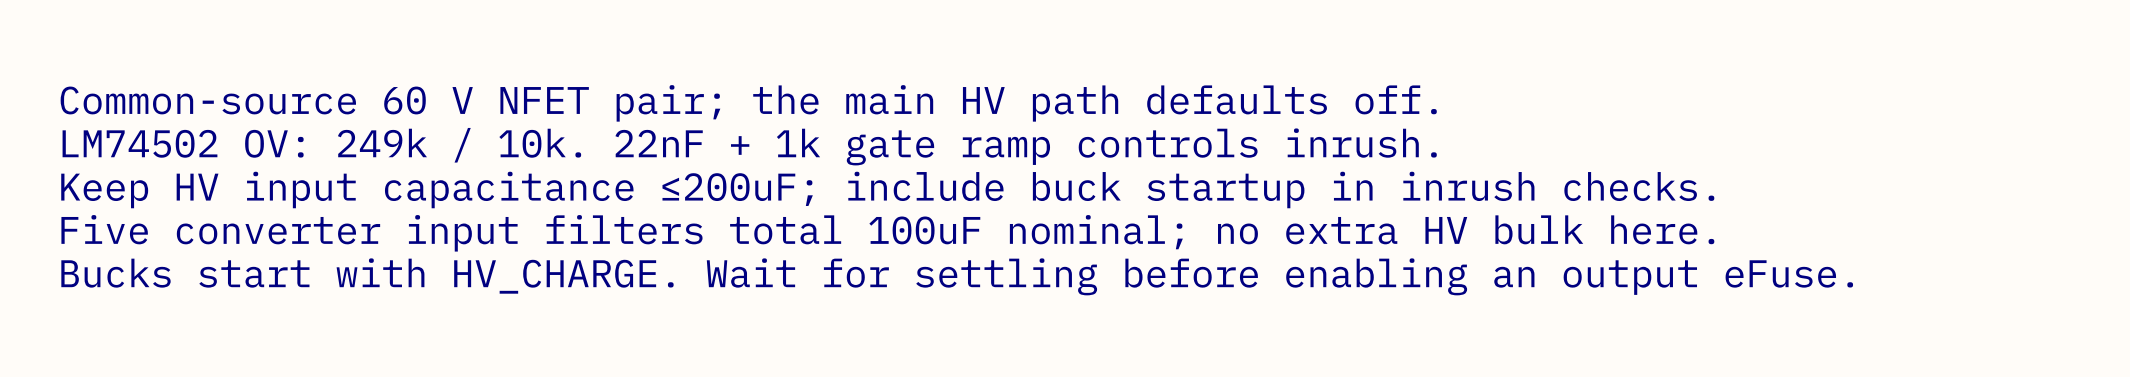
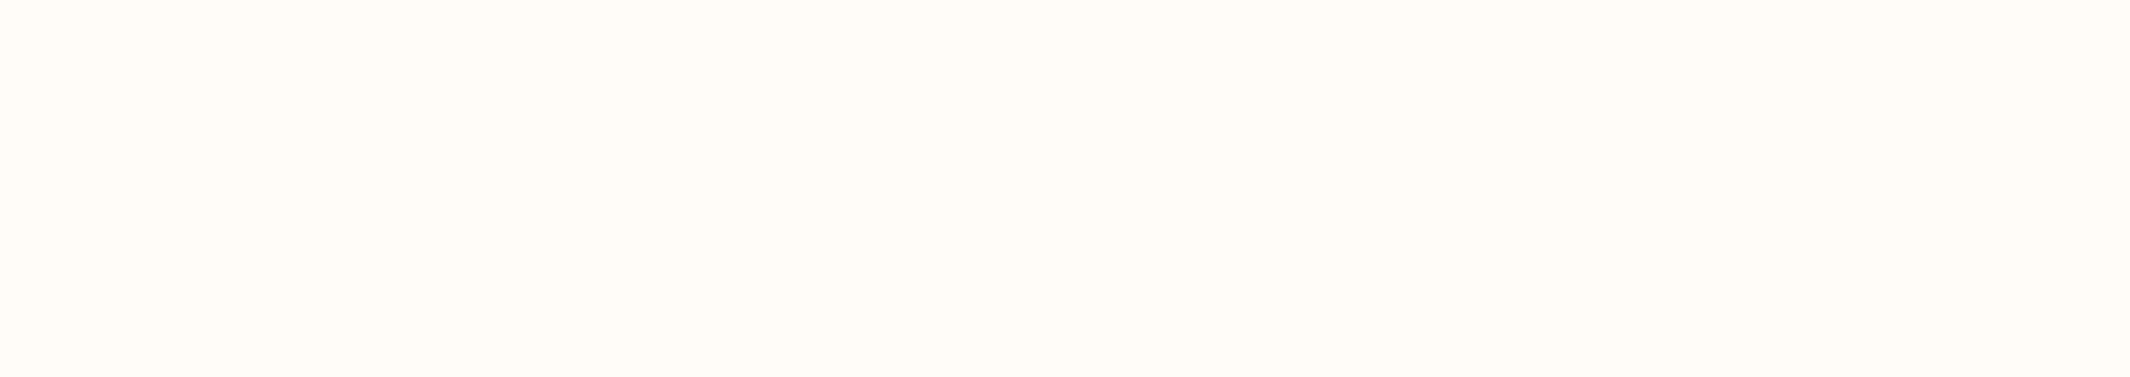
text: Common-source 60 V NFET pair; the main HV path defaults off. (748, 103) -> none
text: LM74502 OV: 249k / 10k. 22nF + 1k gate ramp controls inrush. (749, 146) -> none
text: Keep HV input capacitance ≤200uF; include buck startup in inrush checks. (887, 189) -> none
text: Five converter input filters total 100uF nominal; no extra HV bulk here. (887, 233) -> none
text: Bucks start with HV_CHARGE. Wait for settling before enabling an output eFuse. (957, 276) -> none

